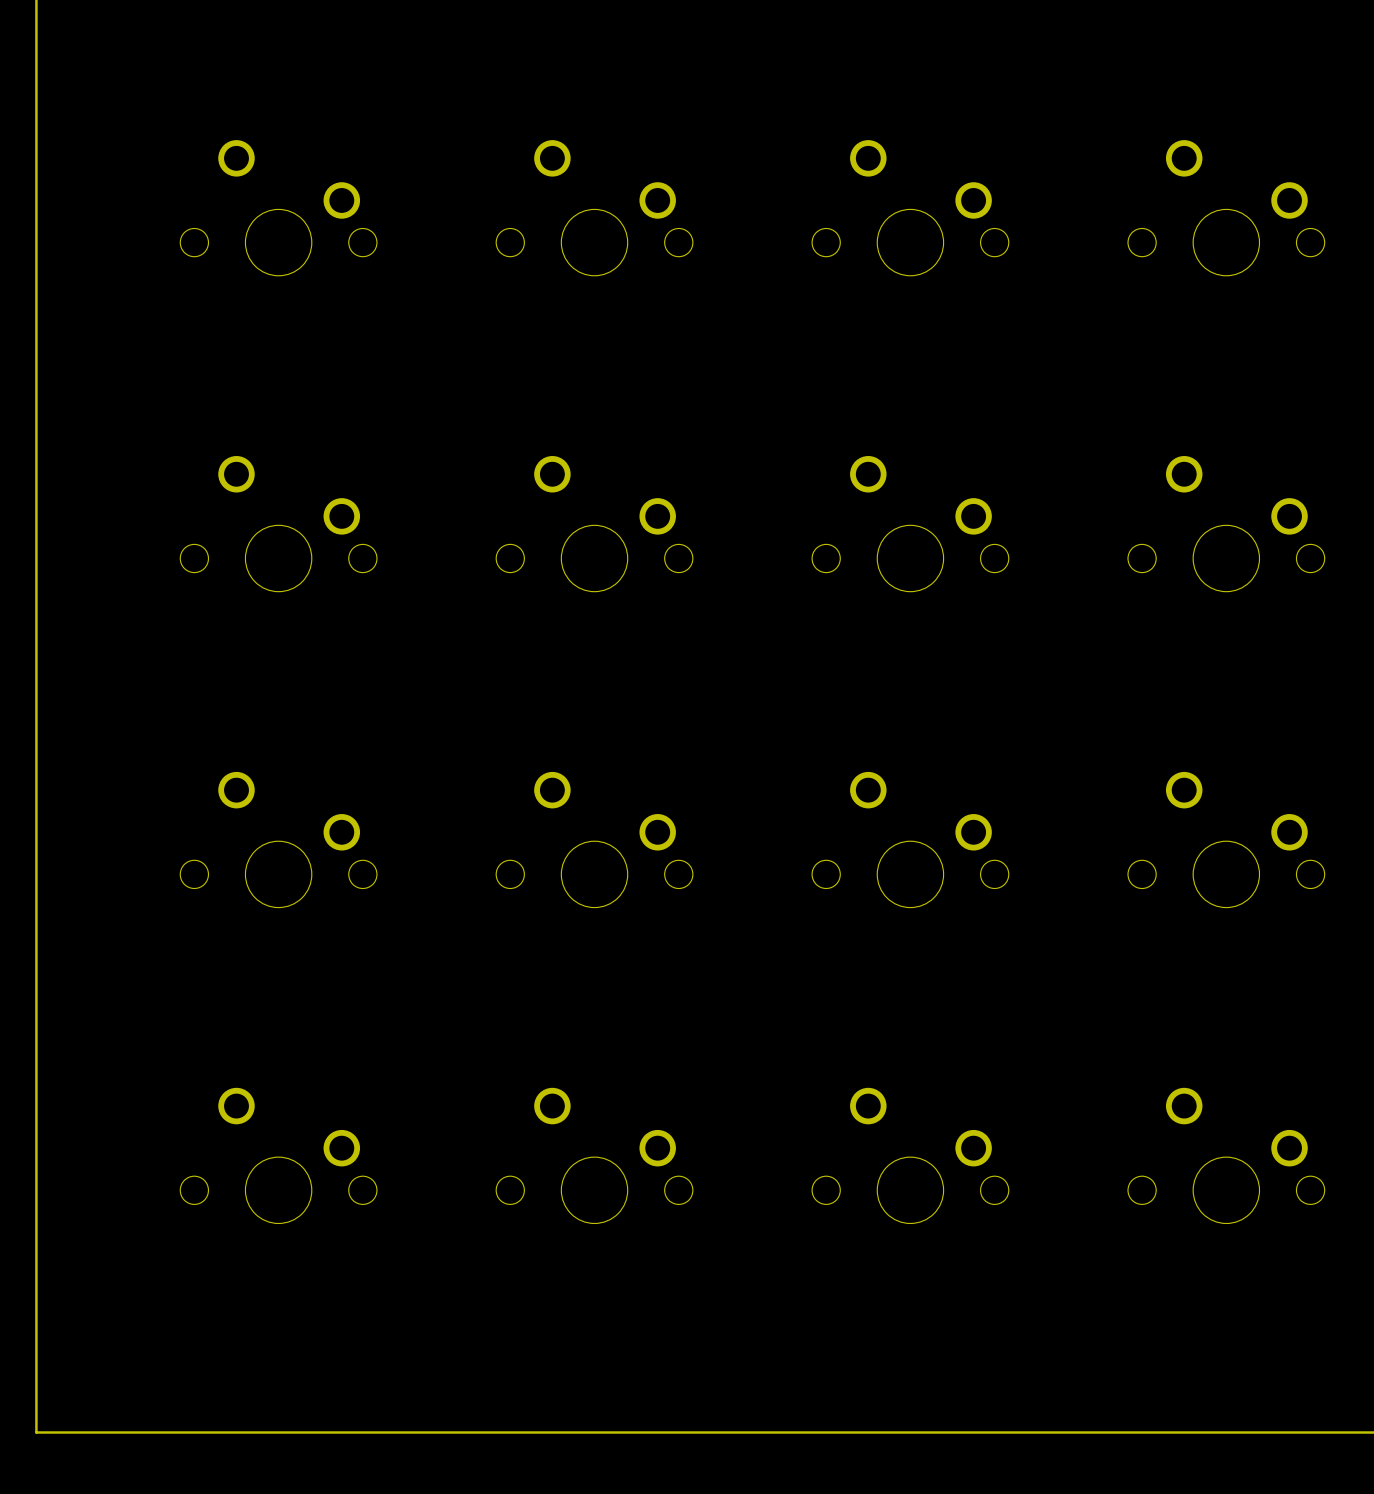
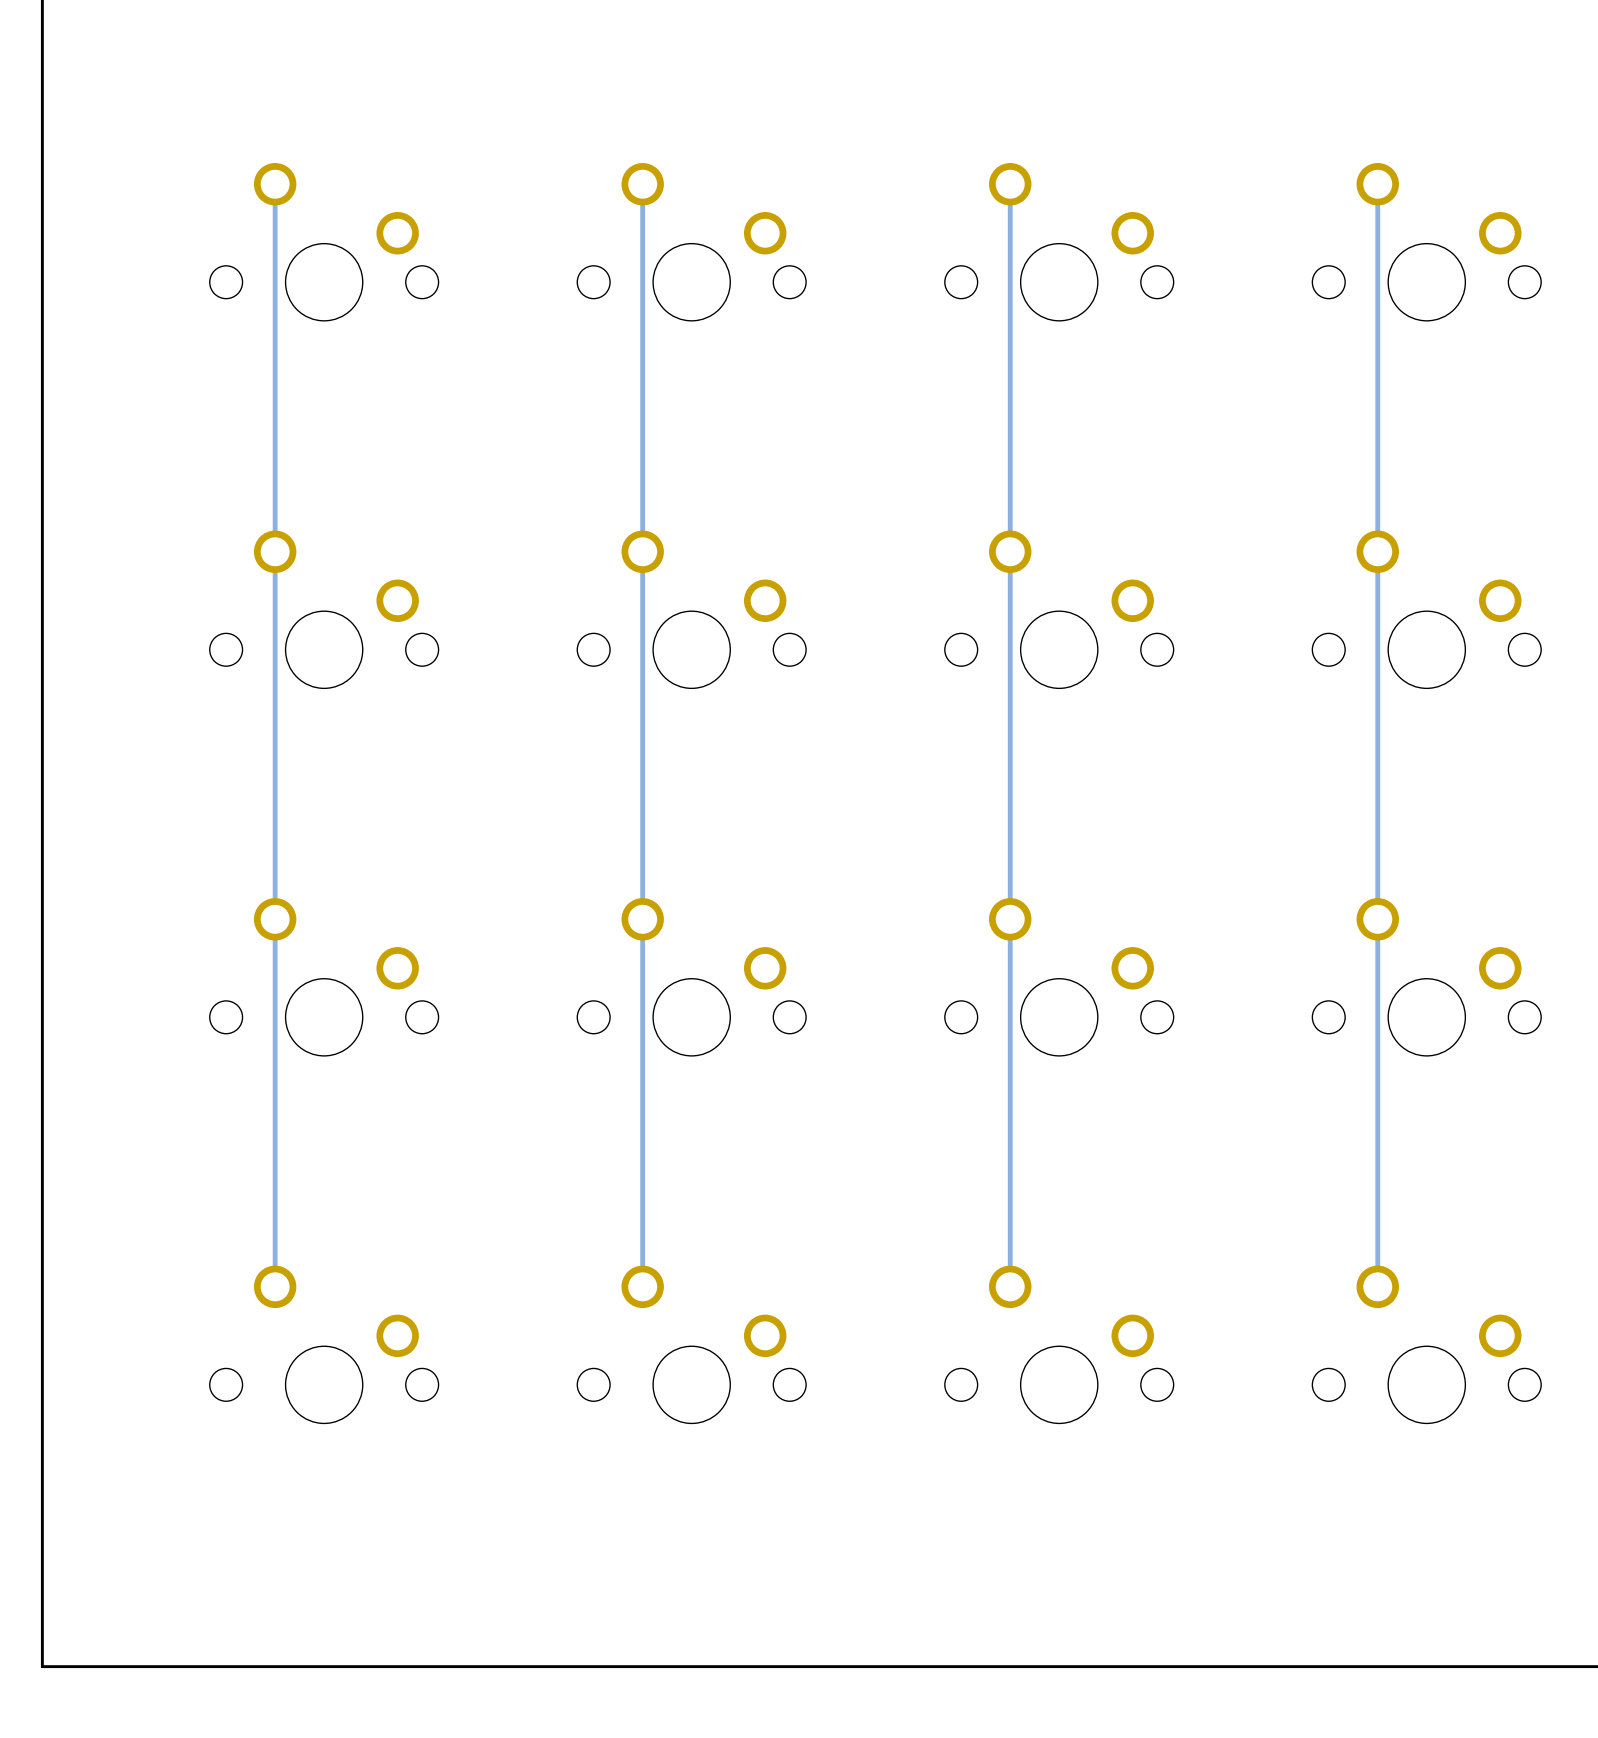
track: none -> (275, 184) (275, 1286)
track: none -> (642, 184) (642, 1286)
track: none -> (1010, 184) (1010, 1286)
track: none -> (1377, 184) (1377, 1286)

